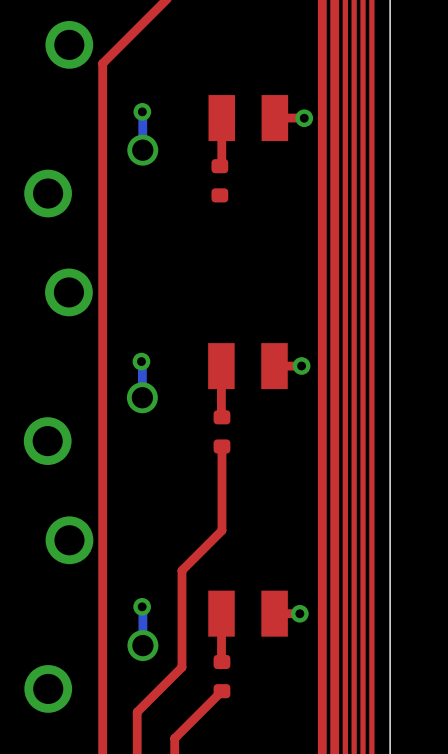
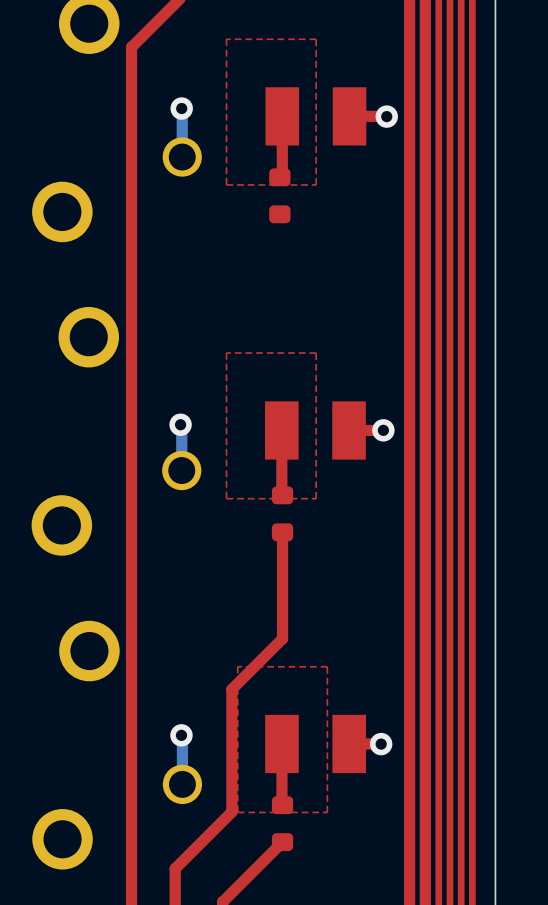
top zone outline: none -> (316, 39) (316, 184) (226, 184) (226, 39) (316, 39)
top zone outline: none -> (316, 353) (226, 353) (226, 498) (316, 498) (316, 353)
top zone outline: none -> (327, 666) (237, 666) (237, 812) (327, 812) (327, 666)

